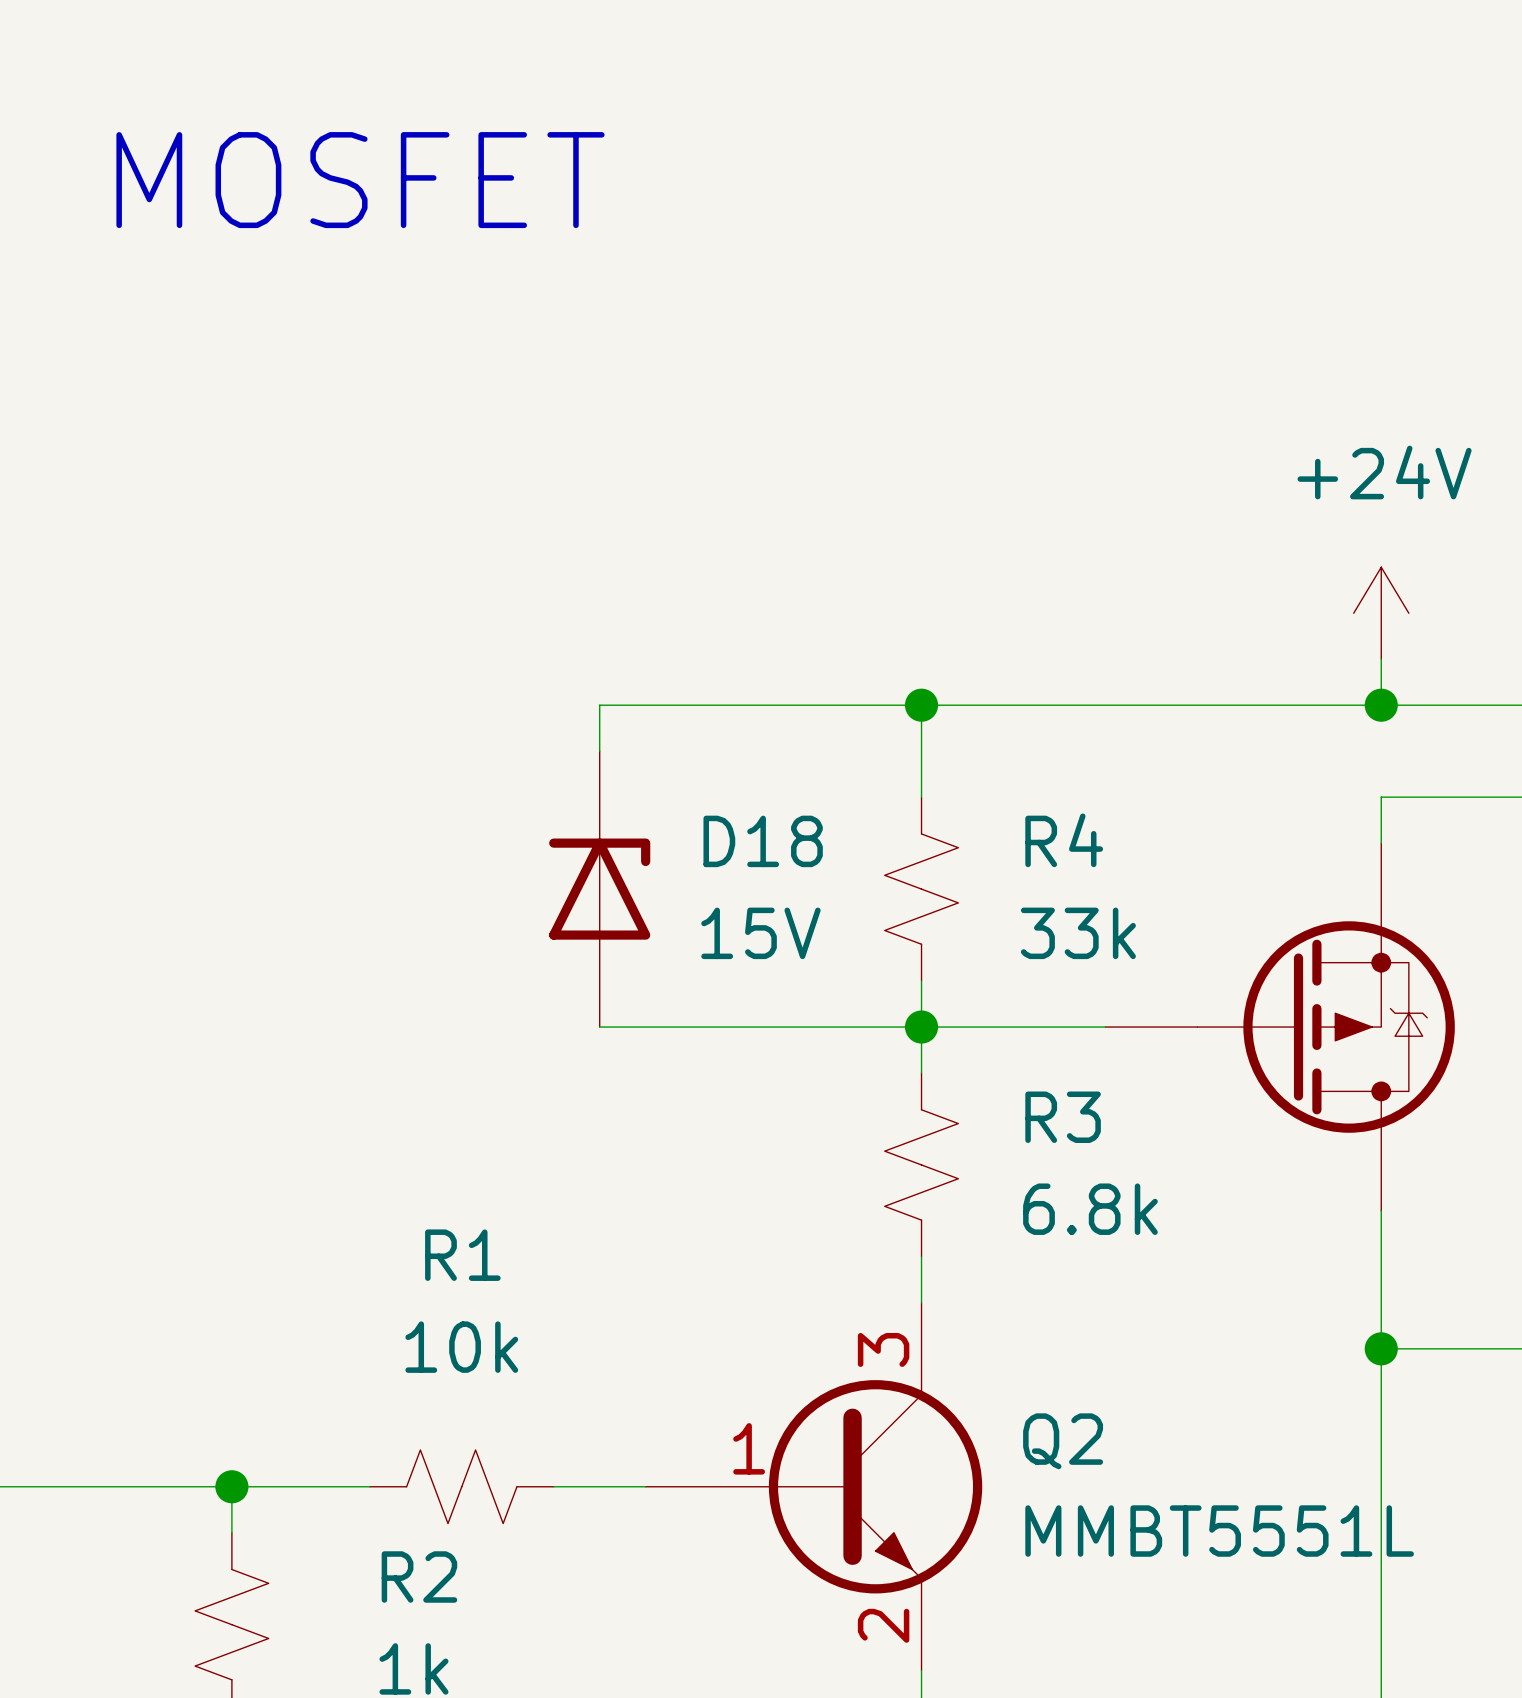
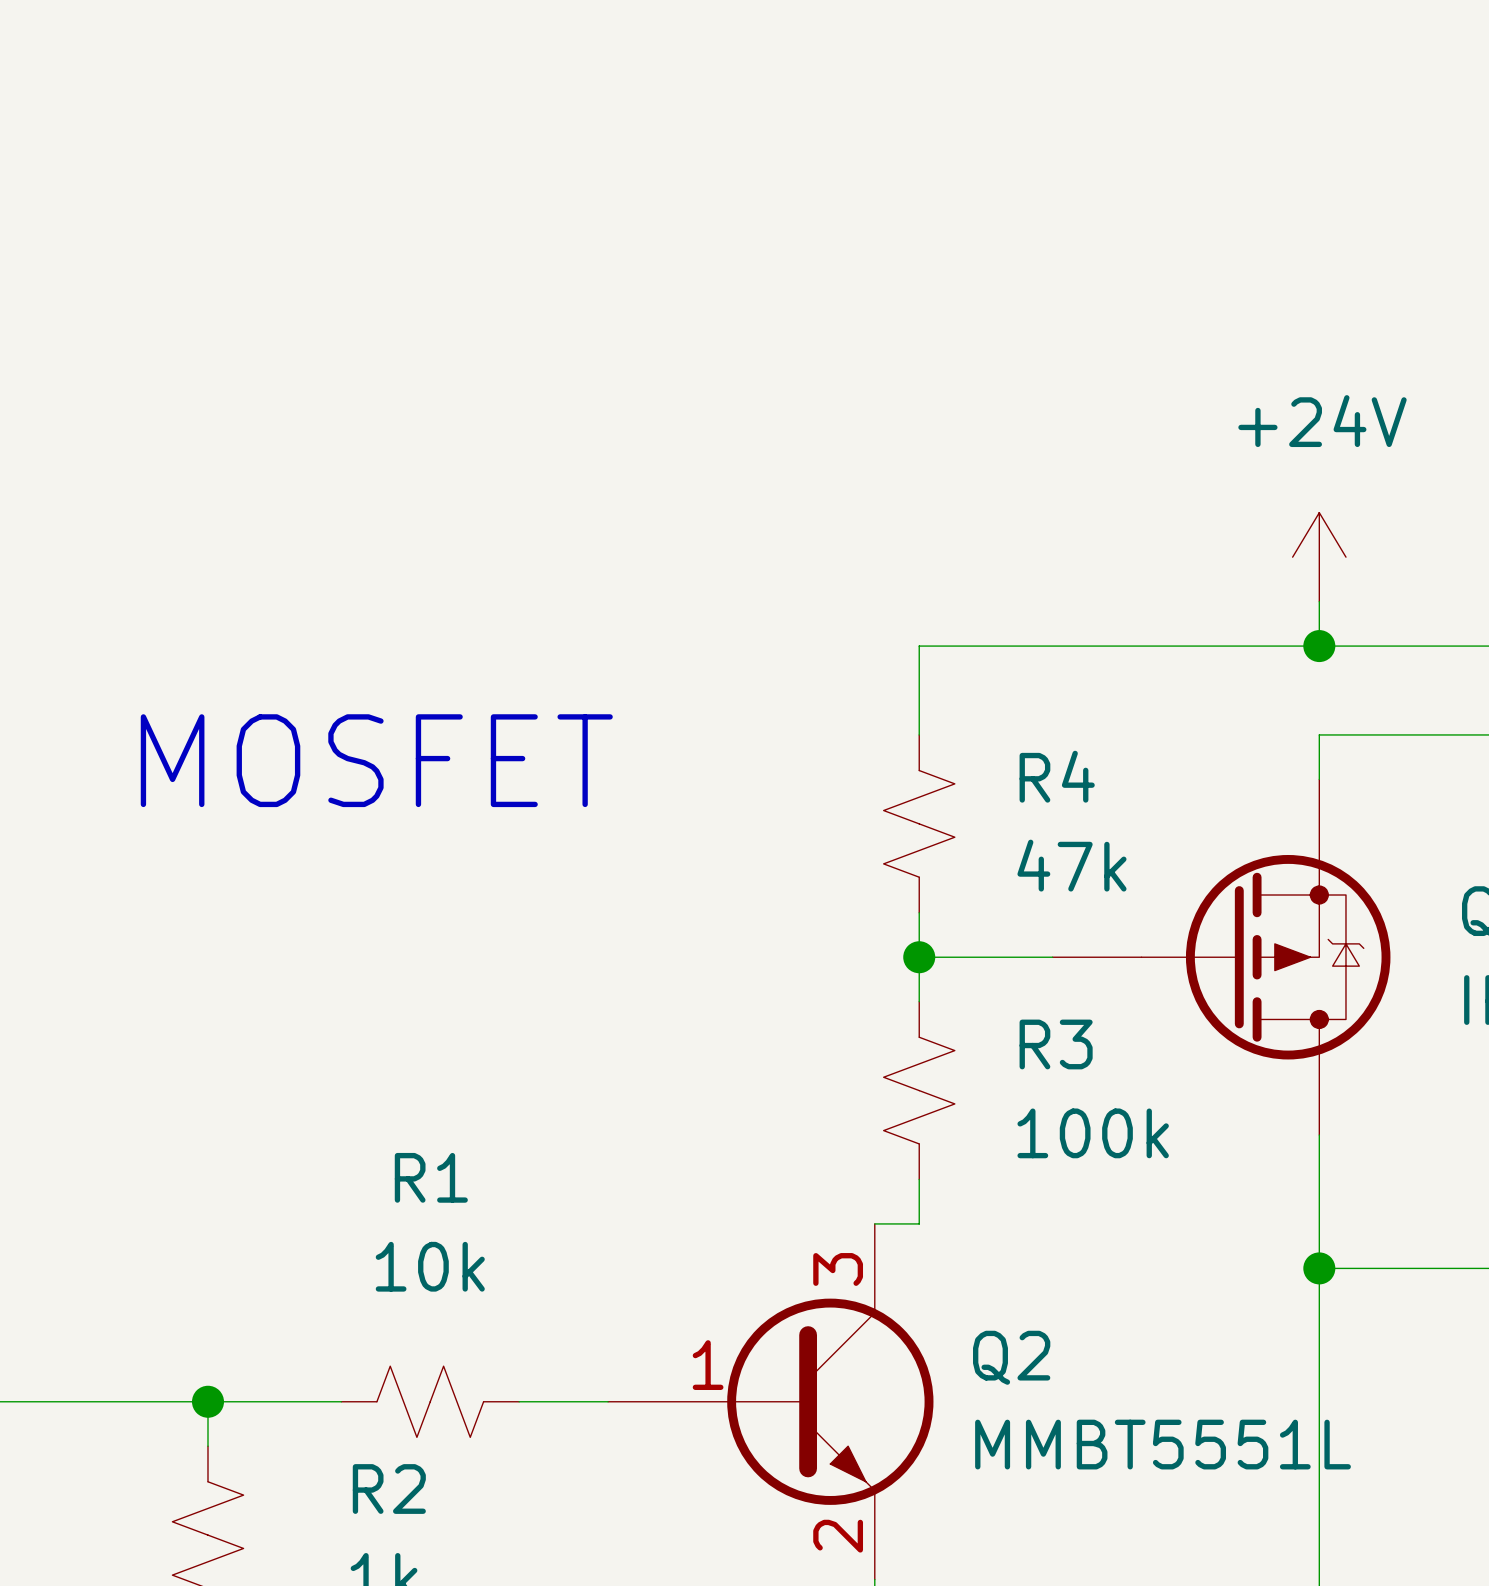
text position: MOSFET (360, 180) -> MOSFET (376, 760)
wire: (921, 705) (921, 797) -> none
junction: (921, 705) -> none
wire: (967, 705) (599, 705) (599, 751) -> (919, 646) (919, 734)
D18: 15V (599, 889) -> none
R4 position: (921, 889) -> (919, 823)
R4 value: 33k (1078, 933) -> 47k (1071, 865)
wire: (921, 981) (921, 1073) -> (919, 912) (919, 1001)
wire: (599, 1027) (967, 1027) -> none
junction position: (921, 1027) -> (919, 957)
R3 position: (921, 1164) -> (919, 1090)
R3 value: 6.8k (1090, 1209) -> 100k (1093, 1133)
wire: (921, 1256) (921, 1302) -> (919, 1179) (919, 1223) (874, 1223)

